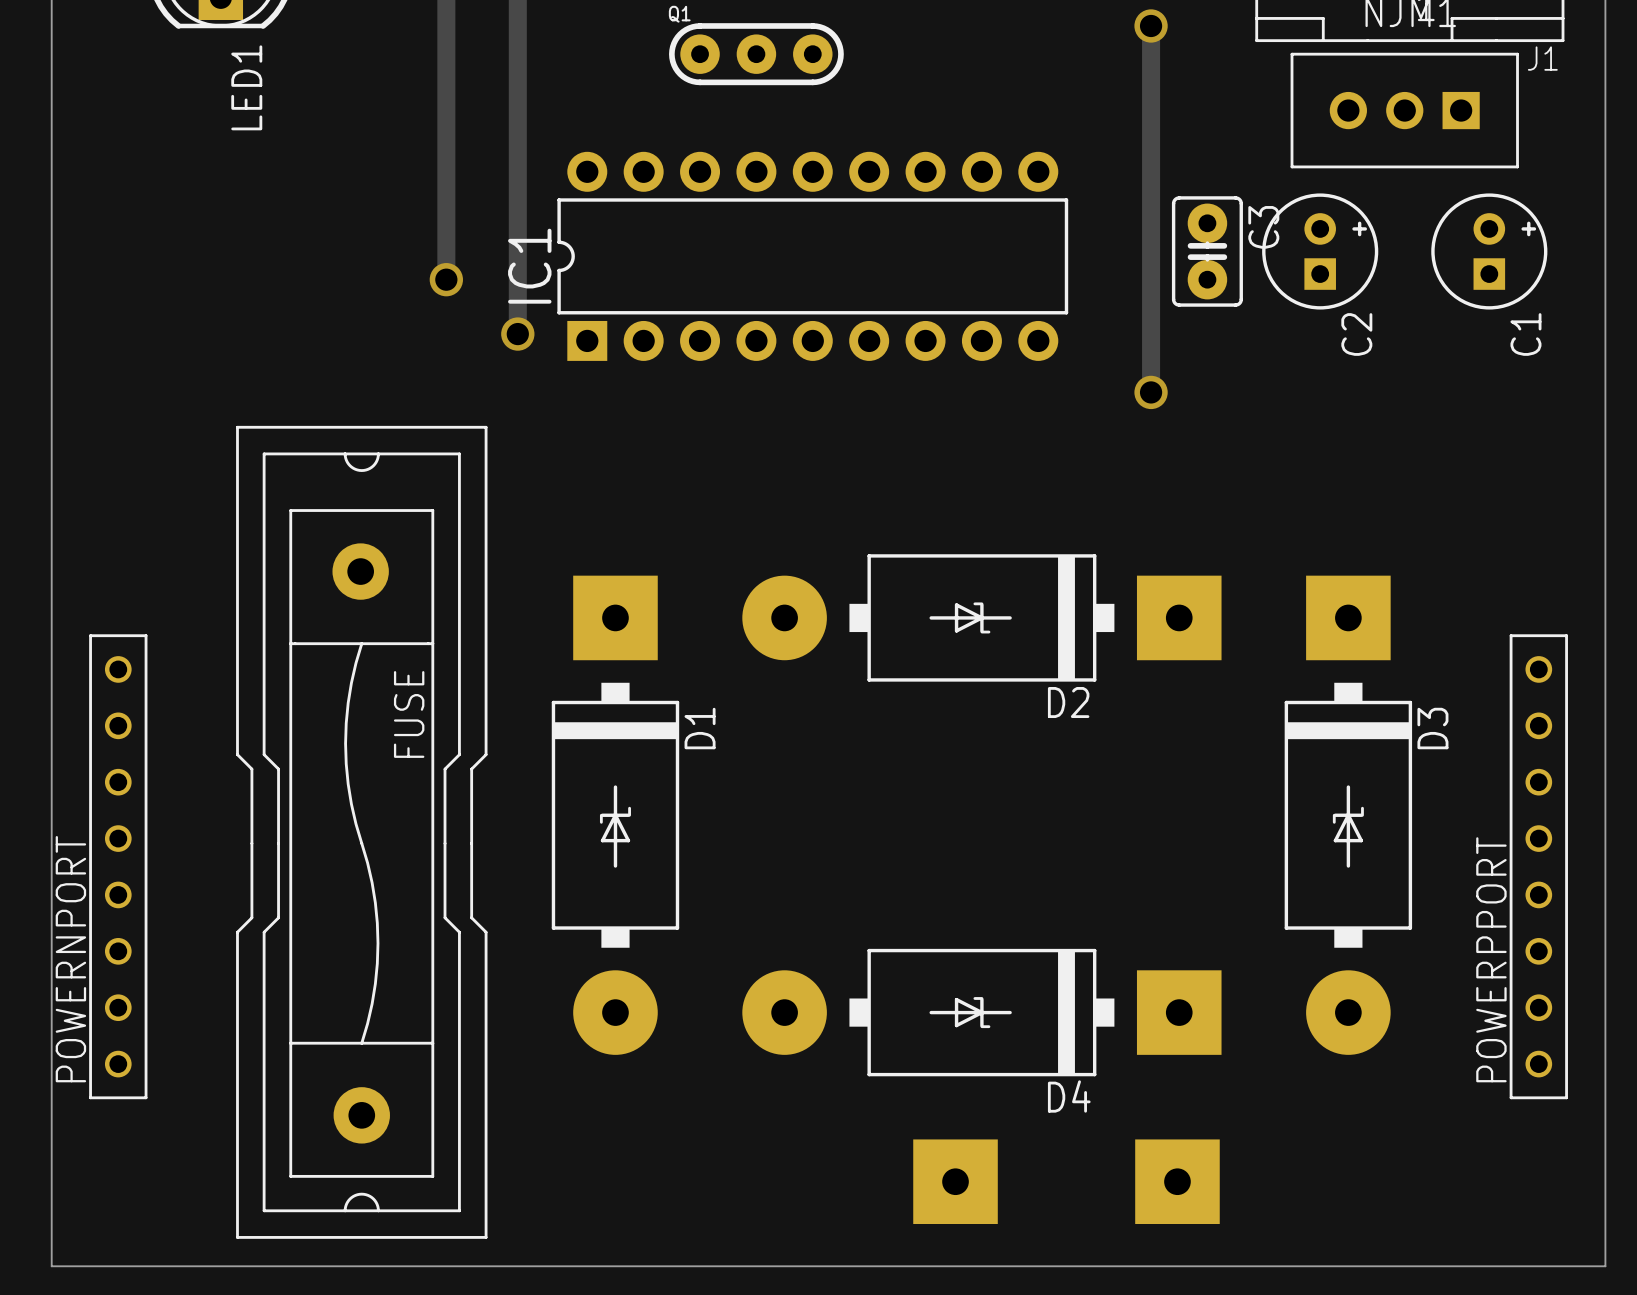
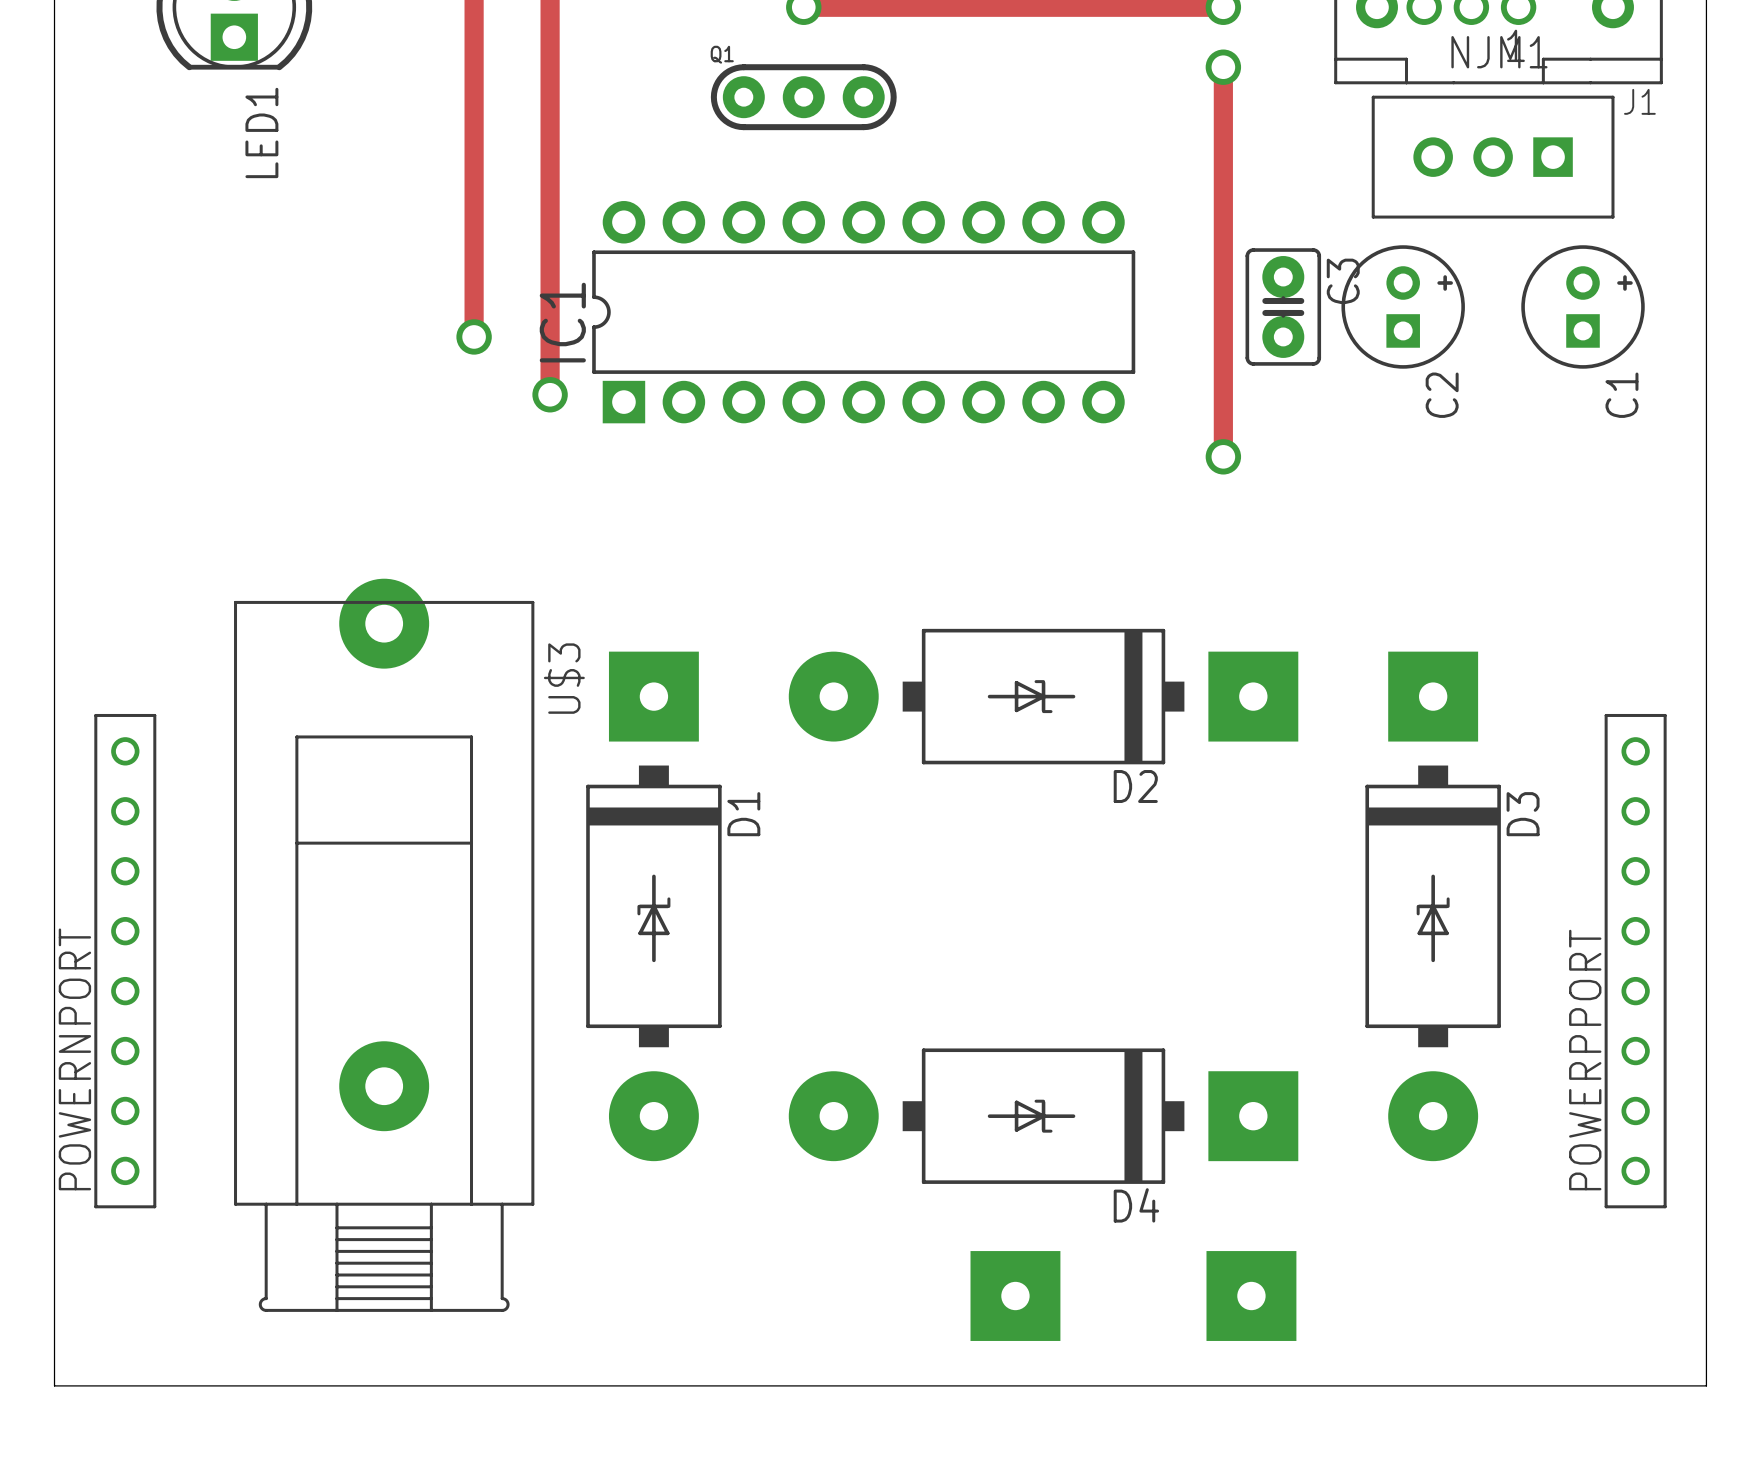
FUSE: (361, 832) -> none
U$3: none -> (384, 945)

